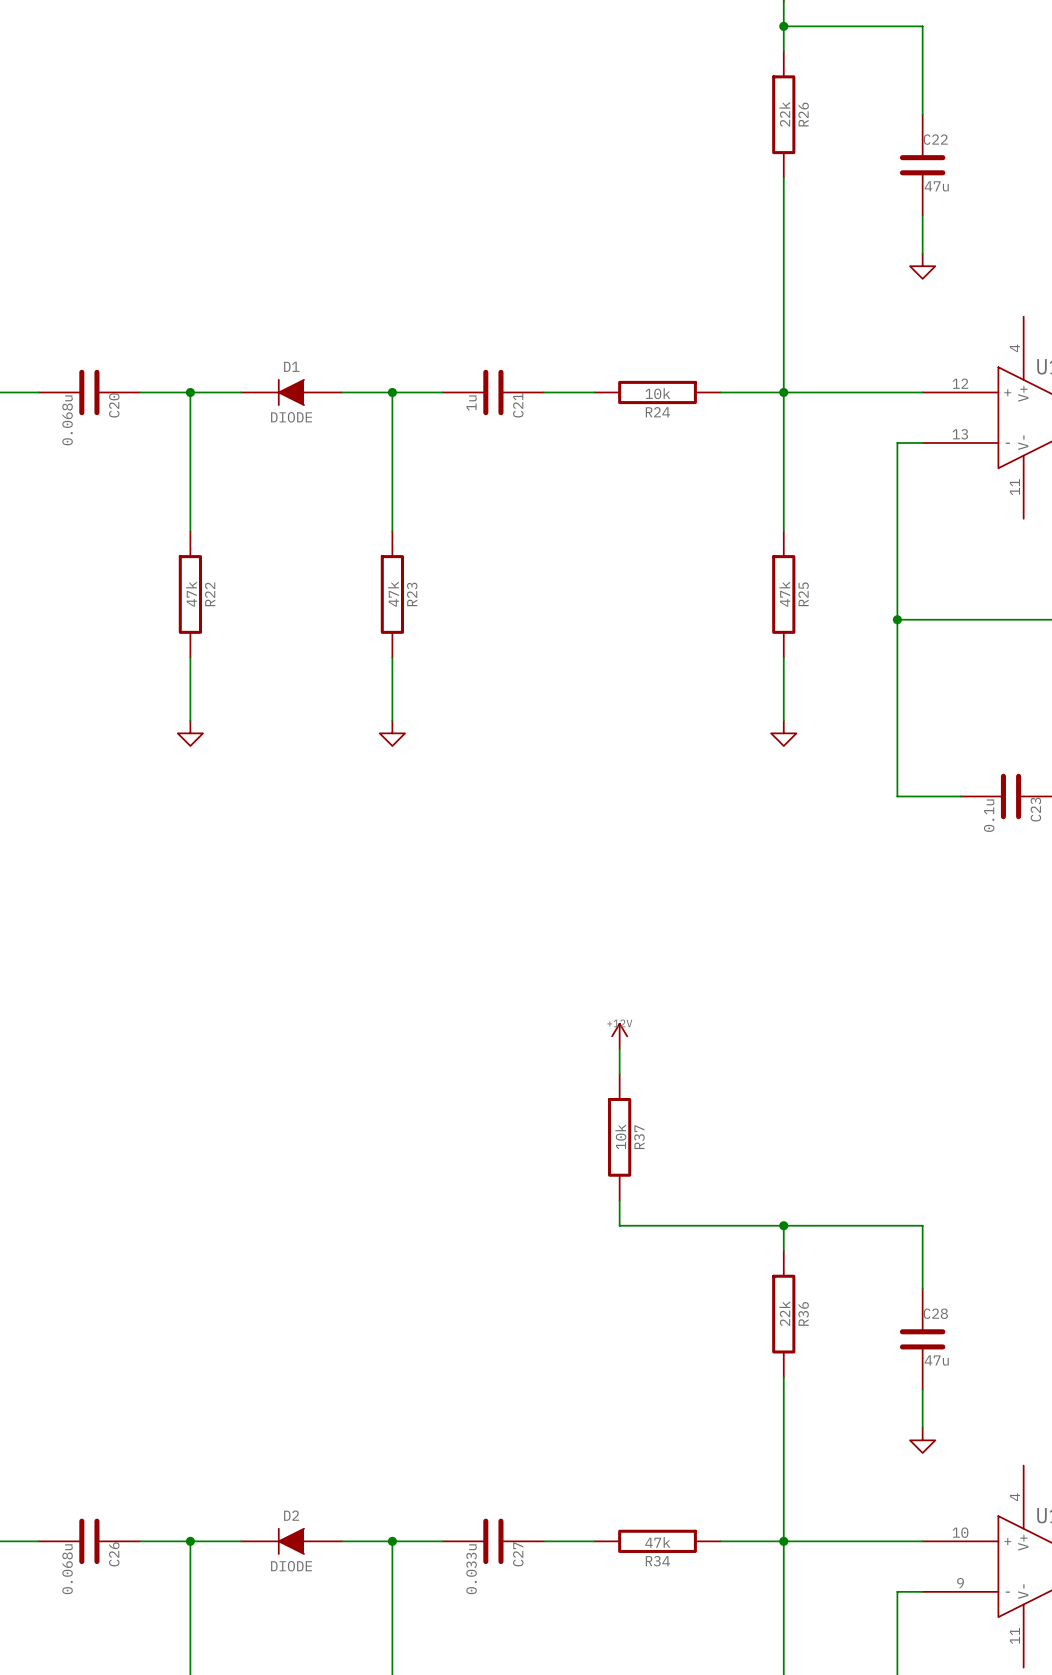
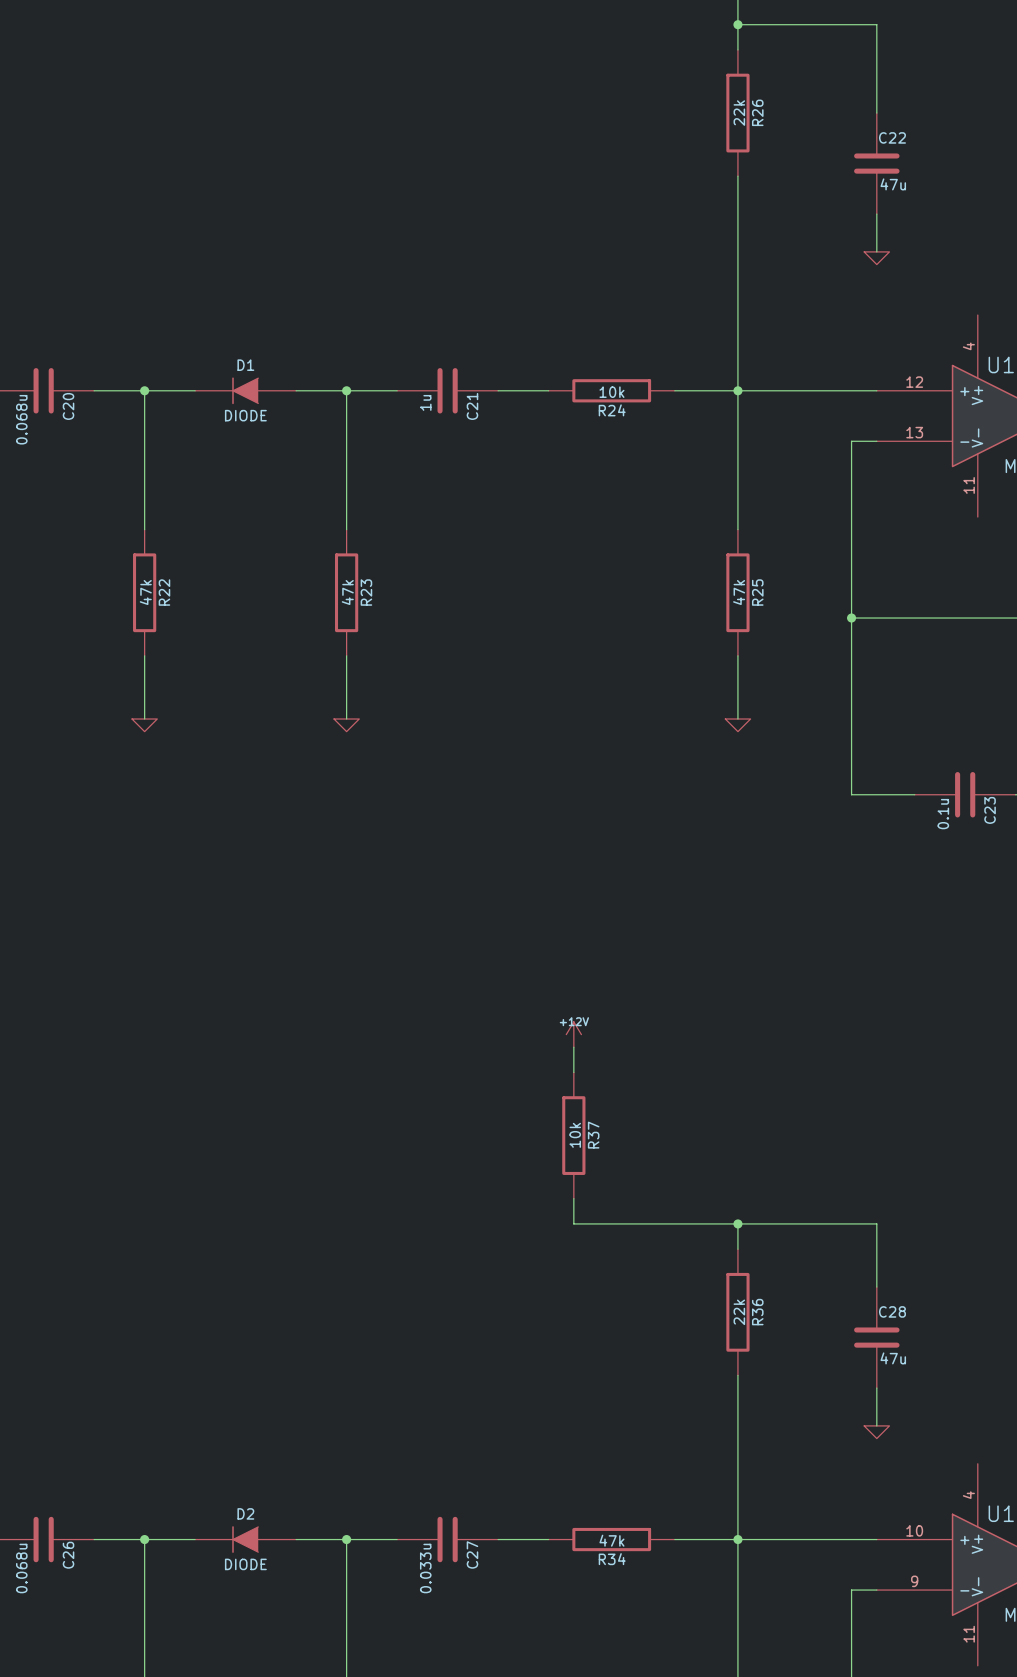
power symbol shape: [910, 253, 936, 279] -> [864, 251, 890, 265]
power symbol shape: [177, 720, 204, 746] -> [132, 719, 158, 732]
power symbol shape: [379, 720, 406, 746] -> [333, 719, 360, 732]
power symbol shape: [771, 720, 797, 746] -> [725, 719, 751, 732]
power symbol shape: [910, 1427, 936, 1453] -> [864, 1425, 890, 1439]

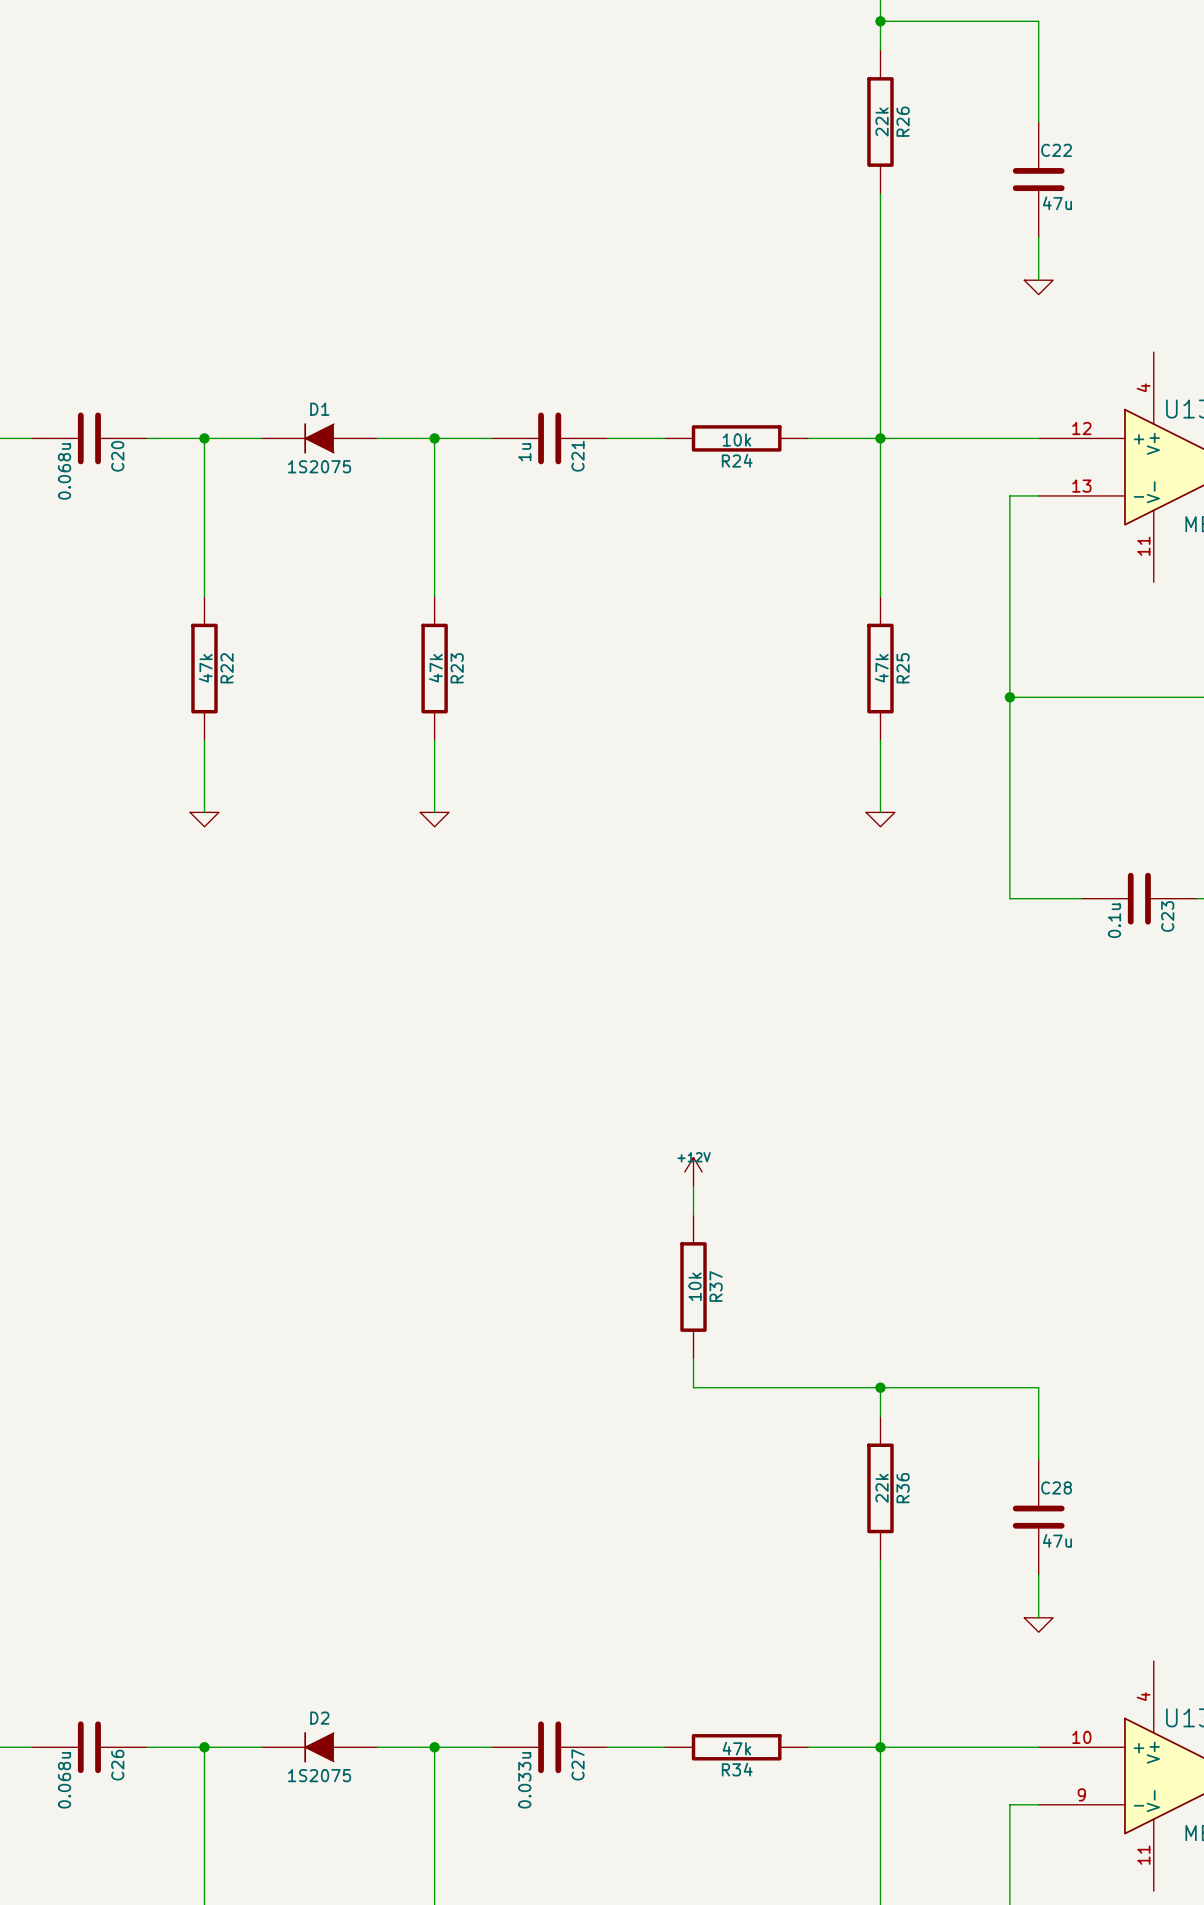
D1 value: DIODE (245, 415) -> 1S2075 (319, 466)
D2 value: DIODE (245, 1564) -> 1S2075 (319, 1775)

